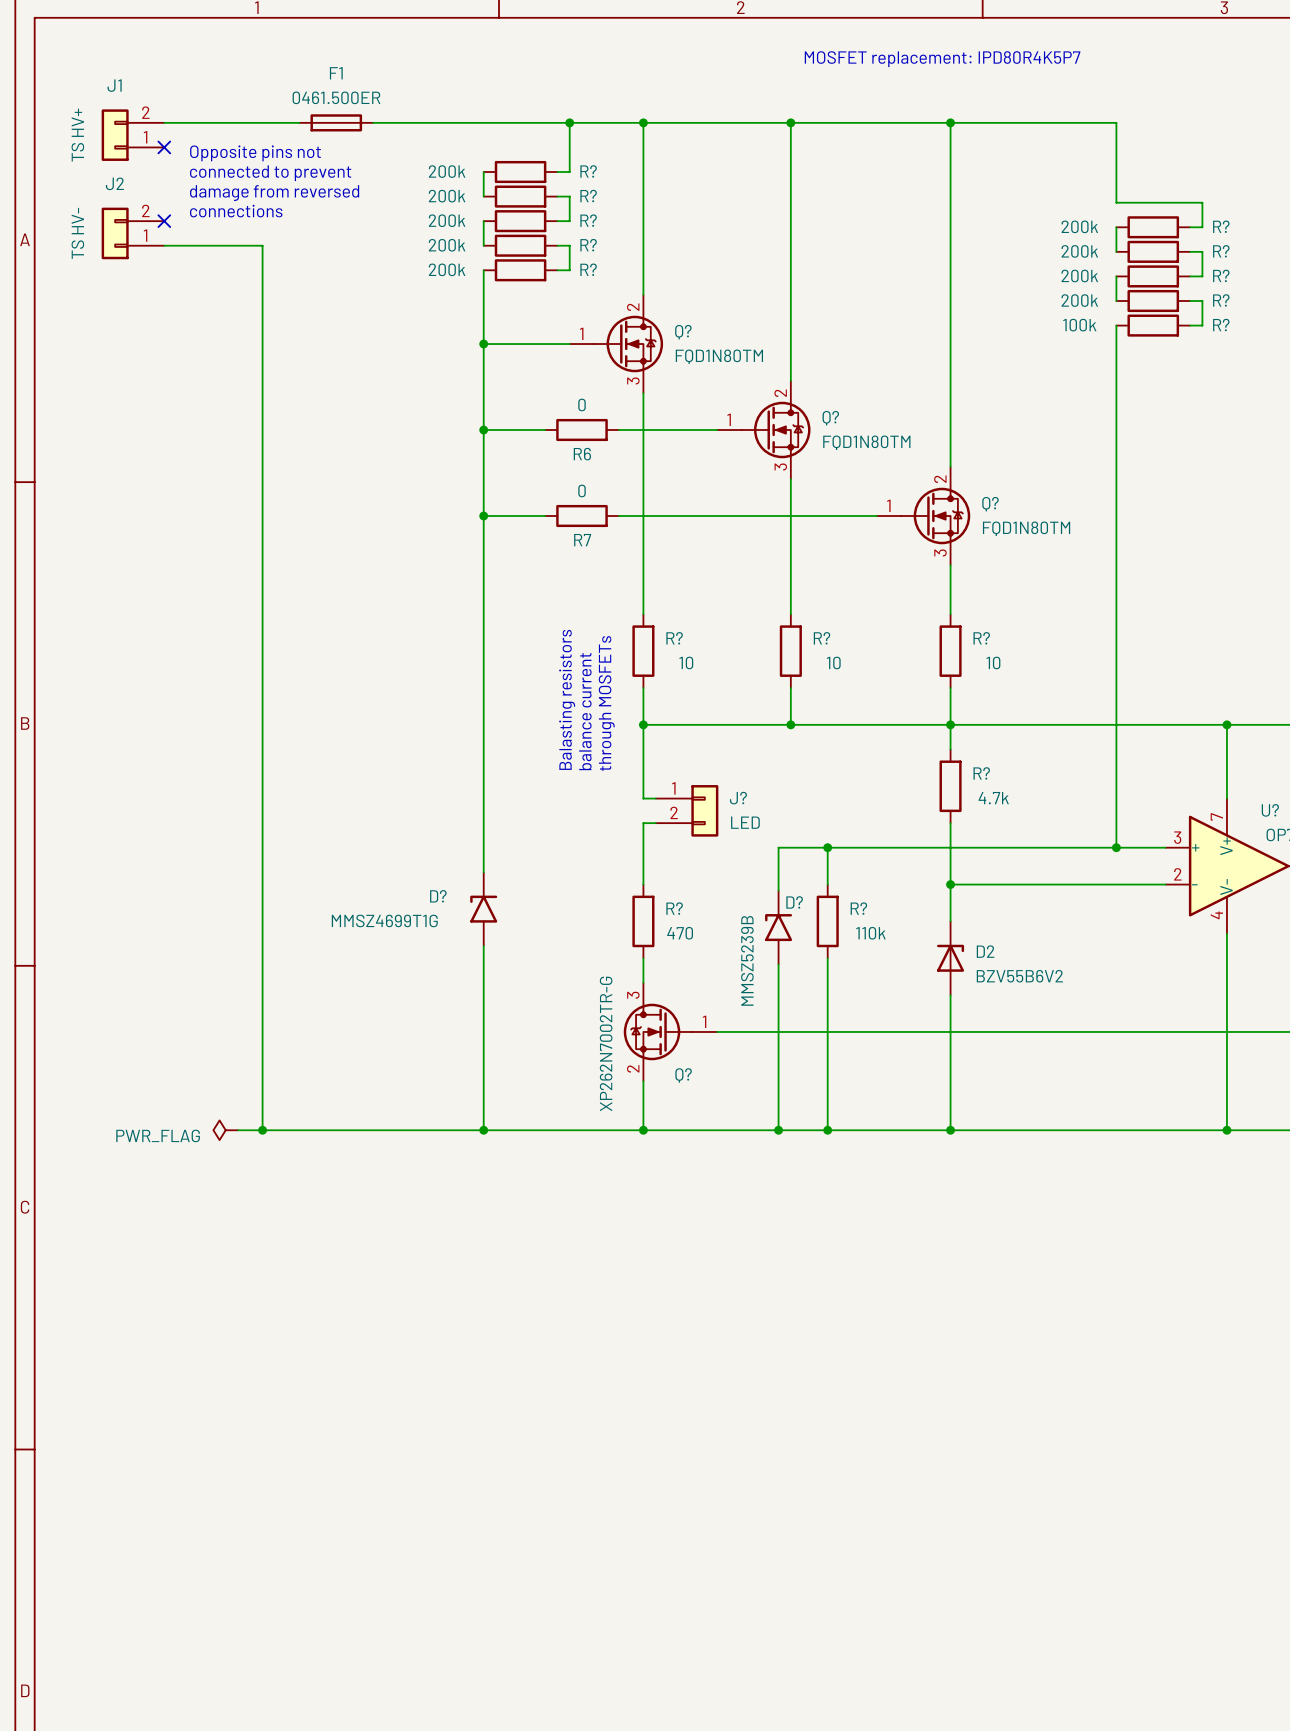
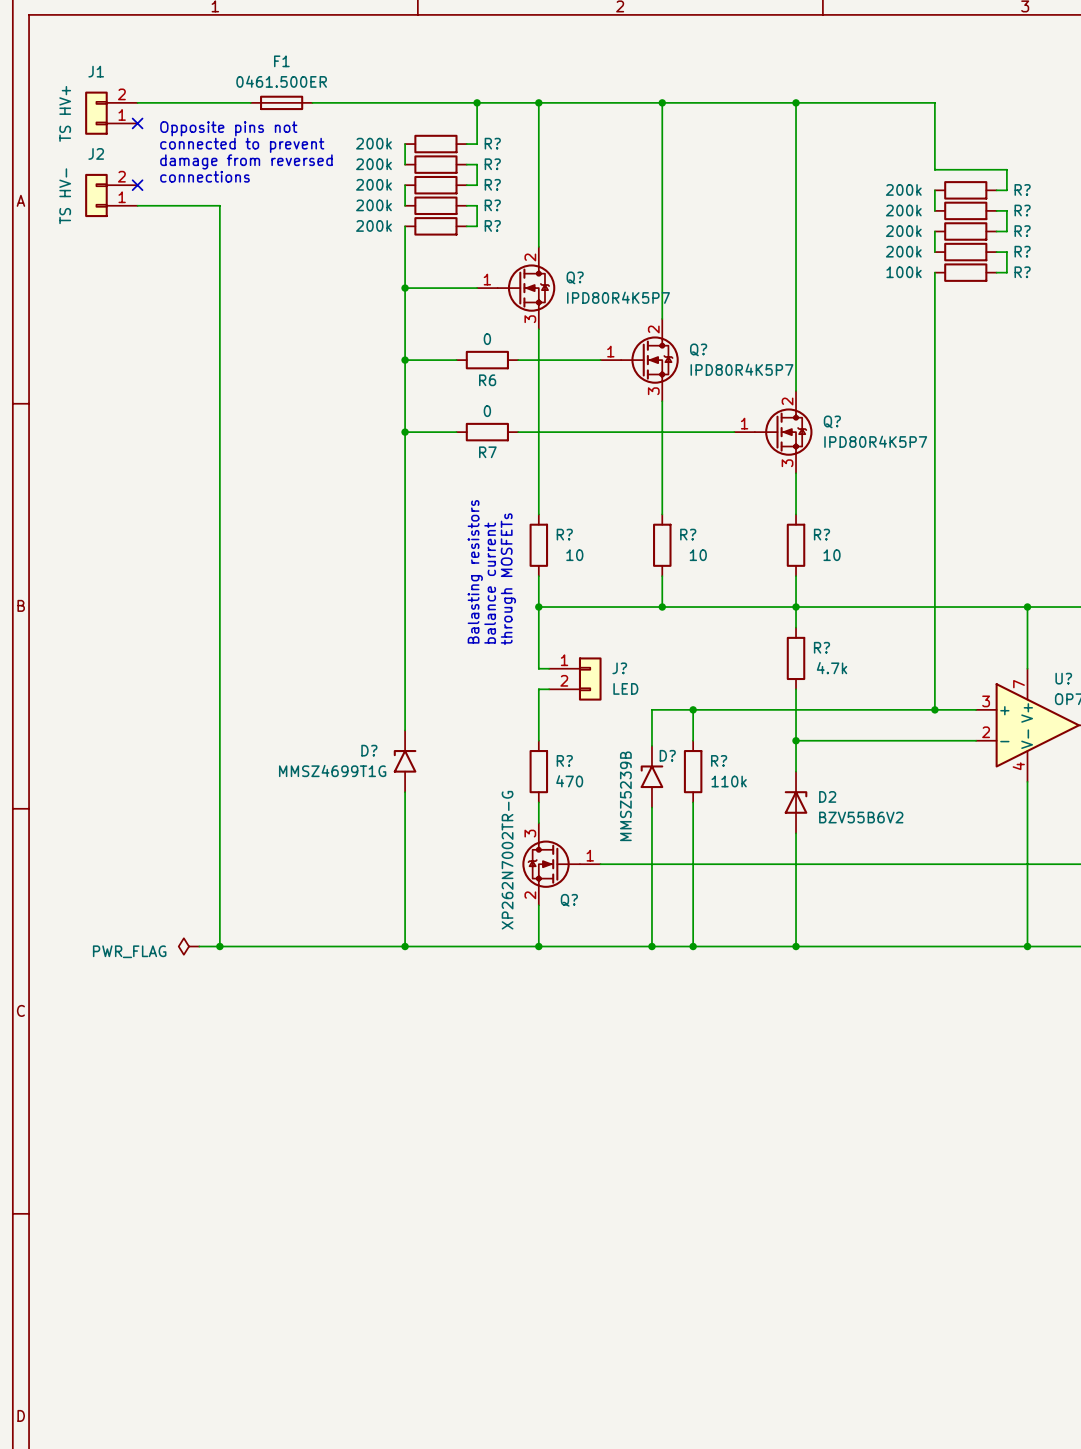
text: MOSFET replacement: IPD80R4K5P7 (942, 59) -> none
Q? value: FQD1N80TM (719, 356) -> IPD80R4K5P7 (618, 297)
Q? value: FQD1N80TM (866, 442) -> IPD80R4K5P7 (741, 369)
Q? value: FQD1N80TM (1026, 528) -> IPD80R4K5P7 (875, 441)

